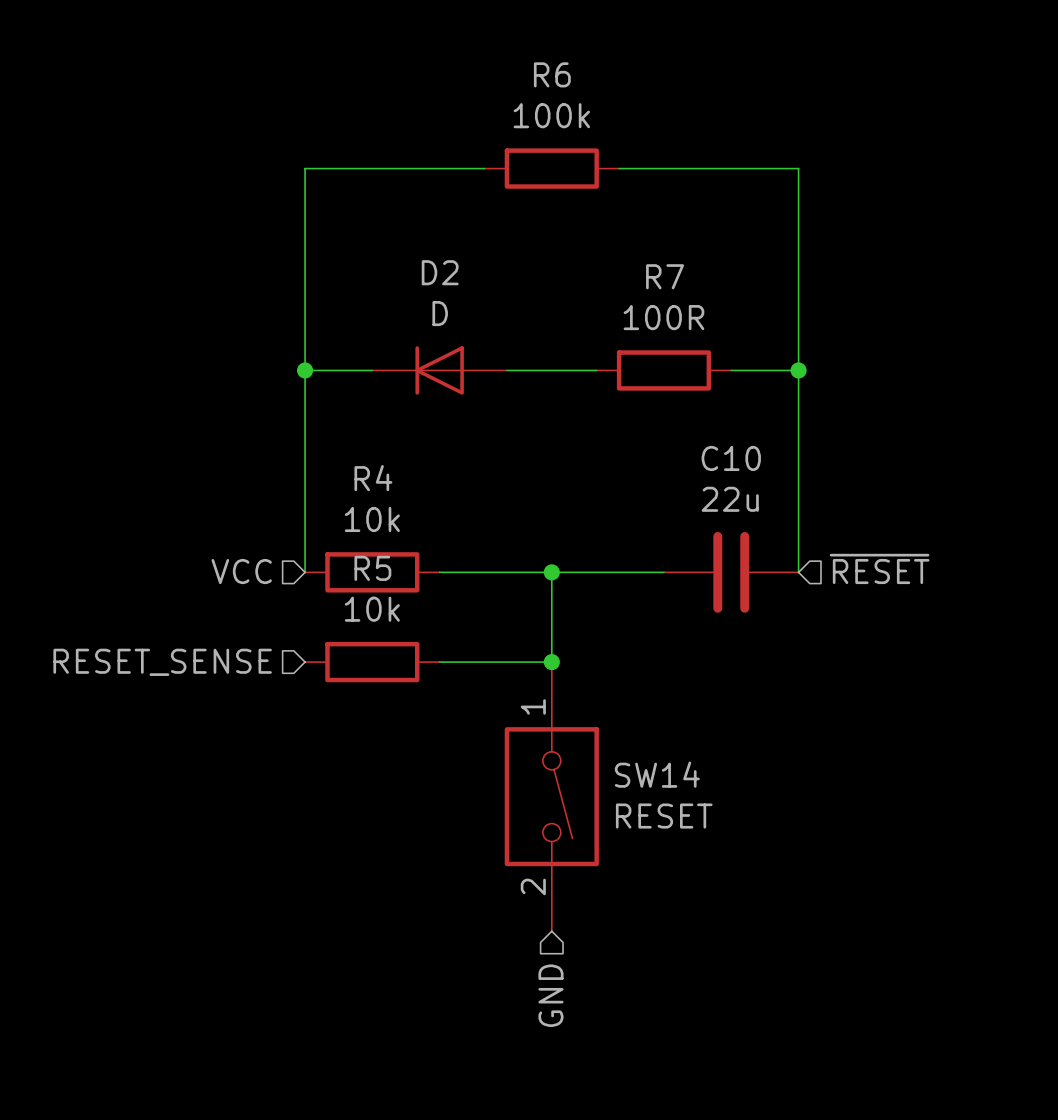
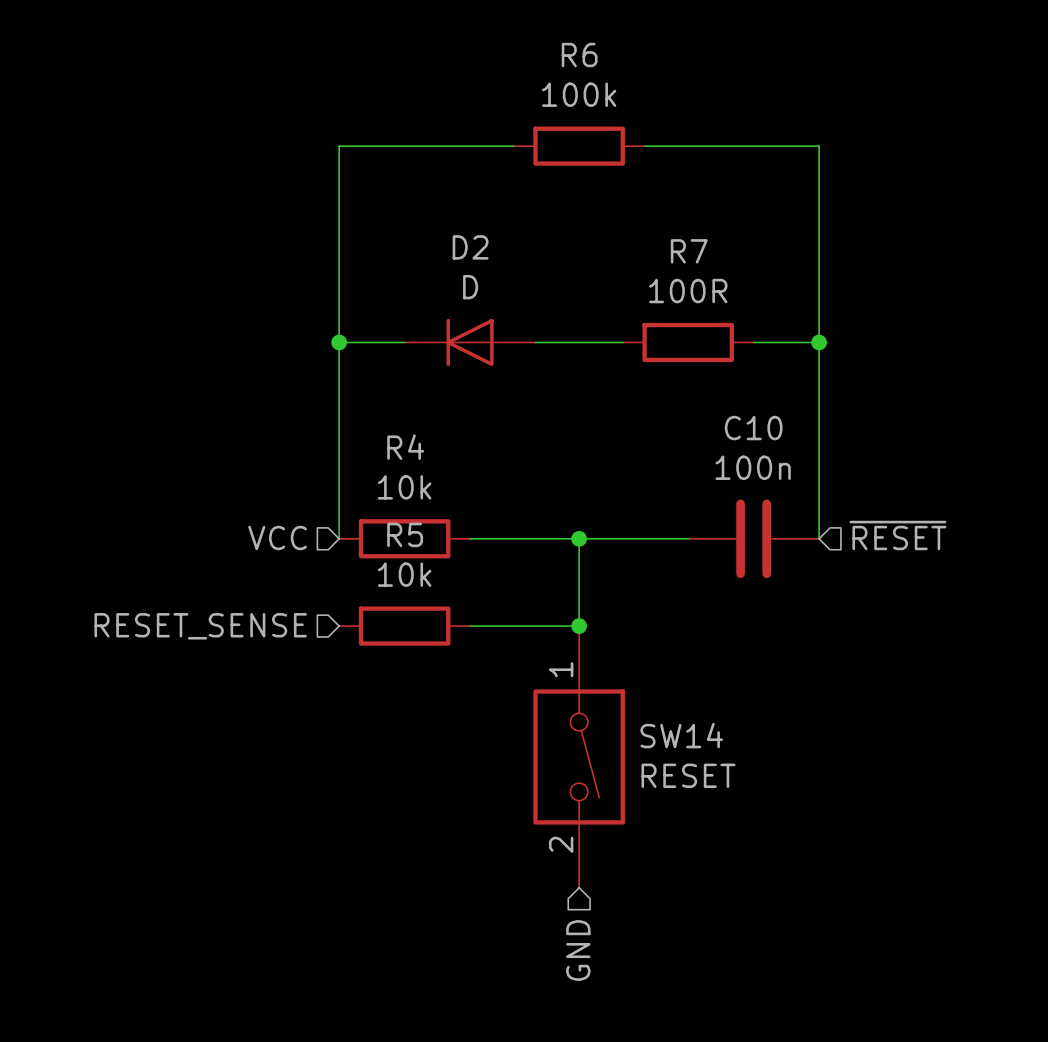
C10 value: 22u (730, 499) -> 100n (753, 467)

